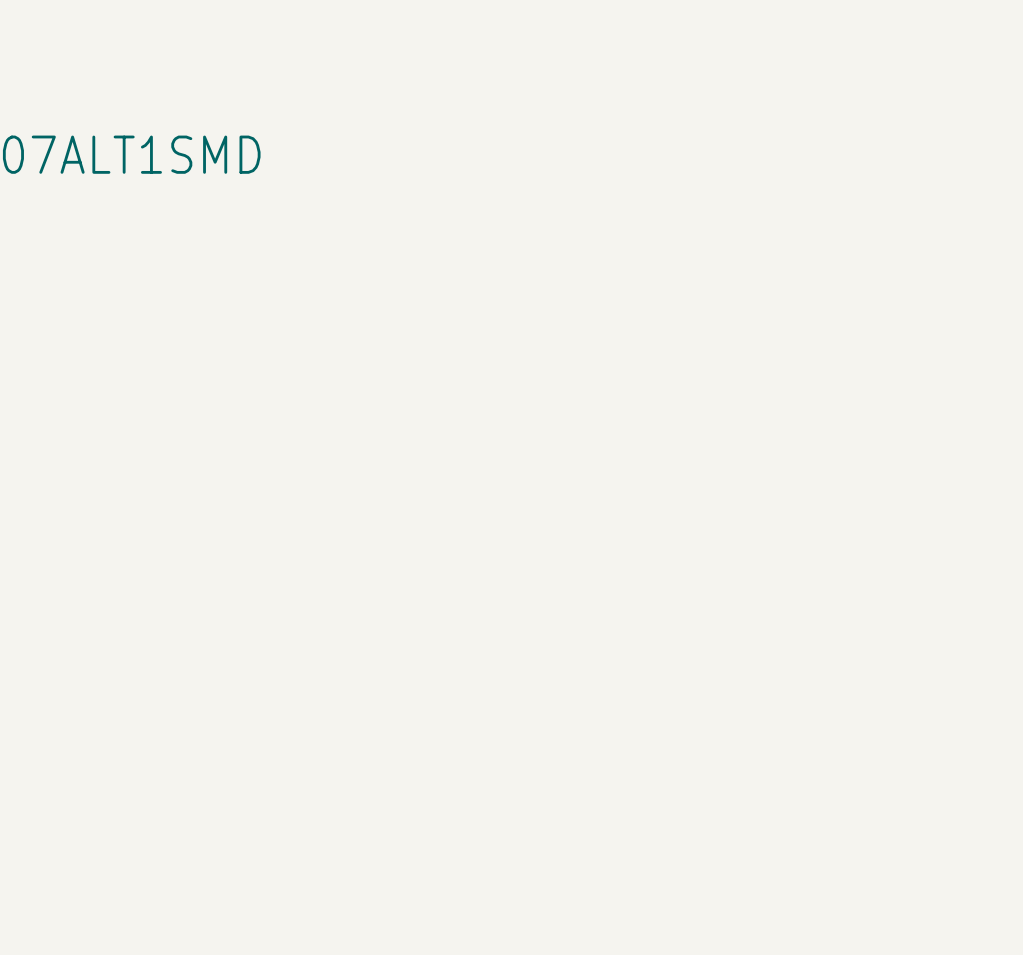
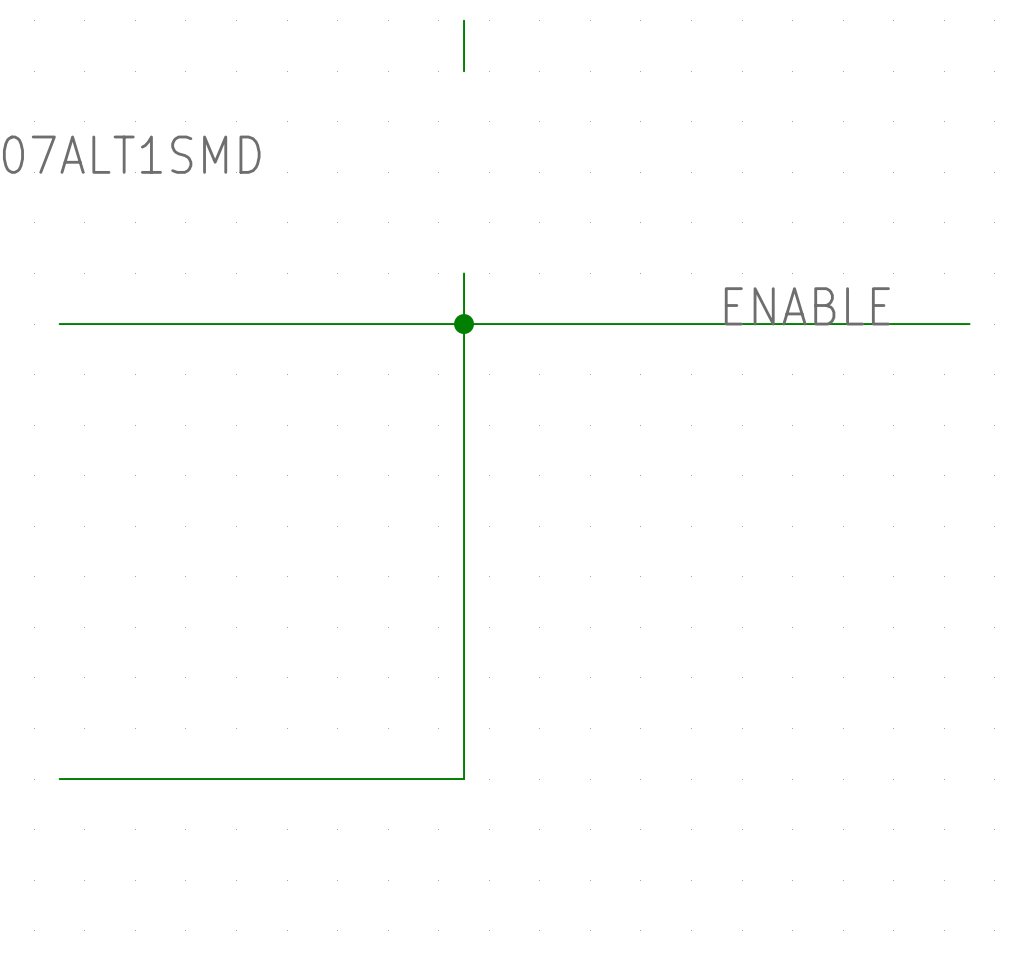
wire: none -> (464, 20) (464, 71)
wire: none -> (464, 273) (464, 779) (59, 779)
label: none -> ENABLE (807, 306)
wire: none -> (59, 324) (969, 324)
junction: none -> (464, 324)

